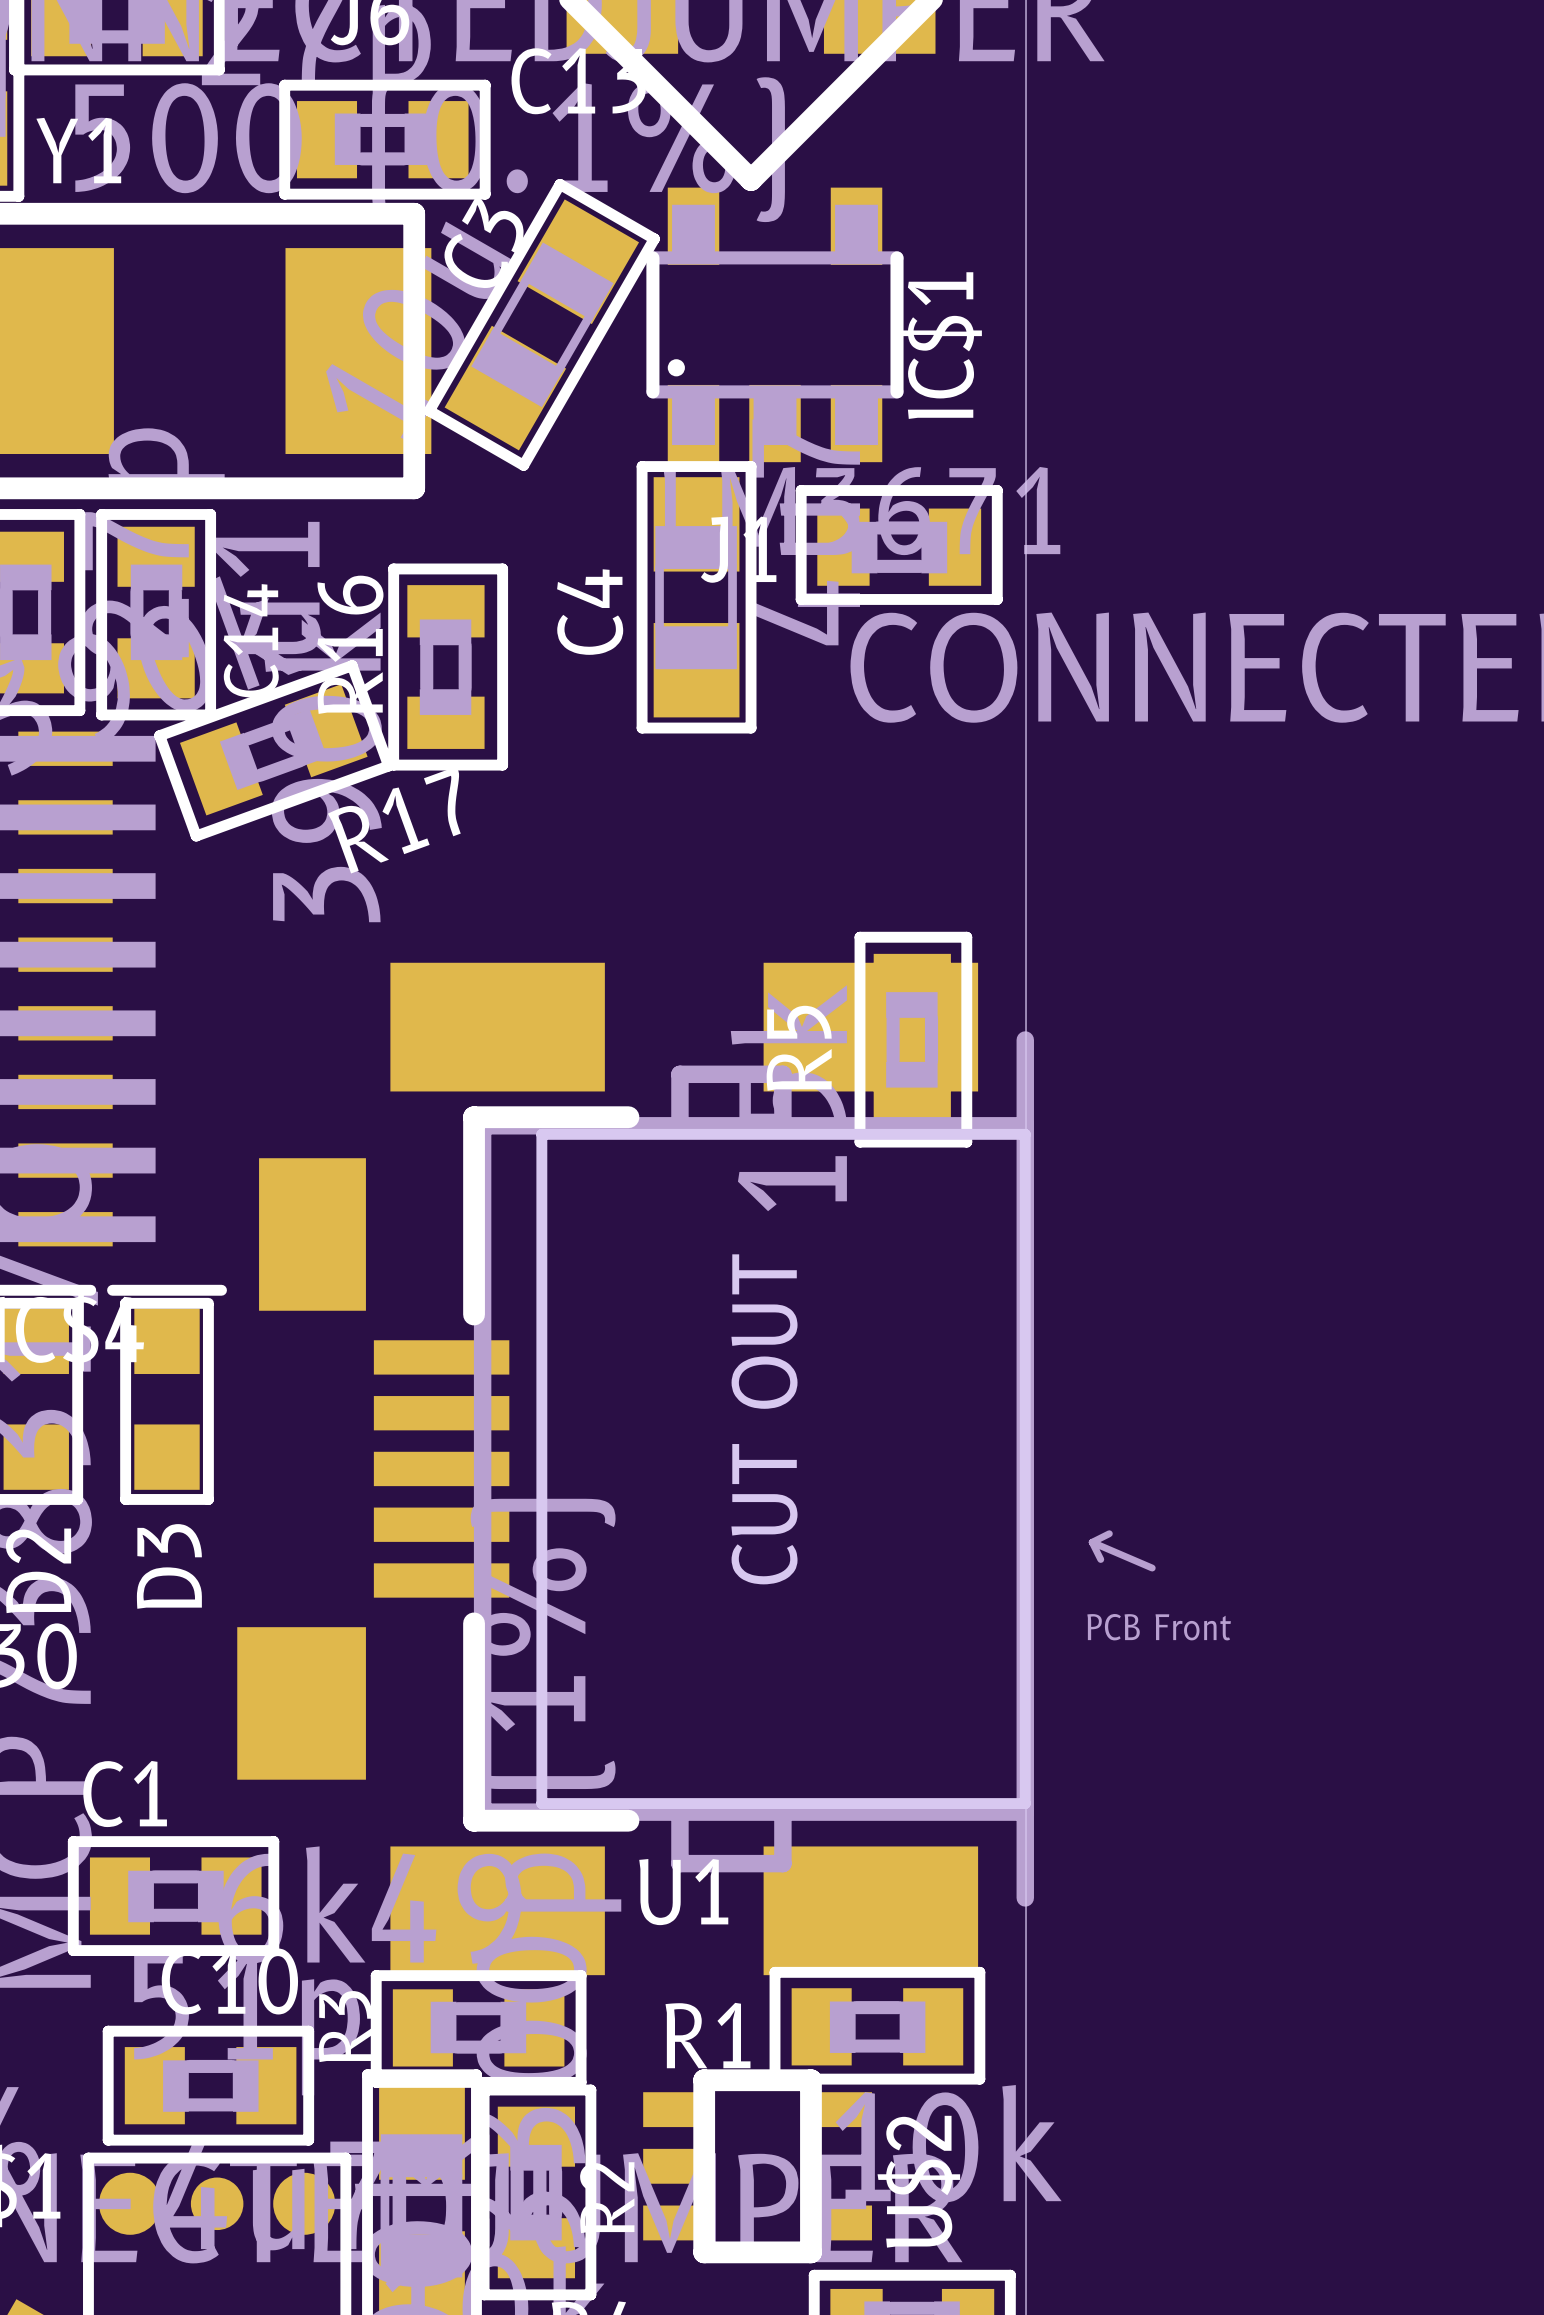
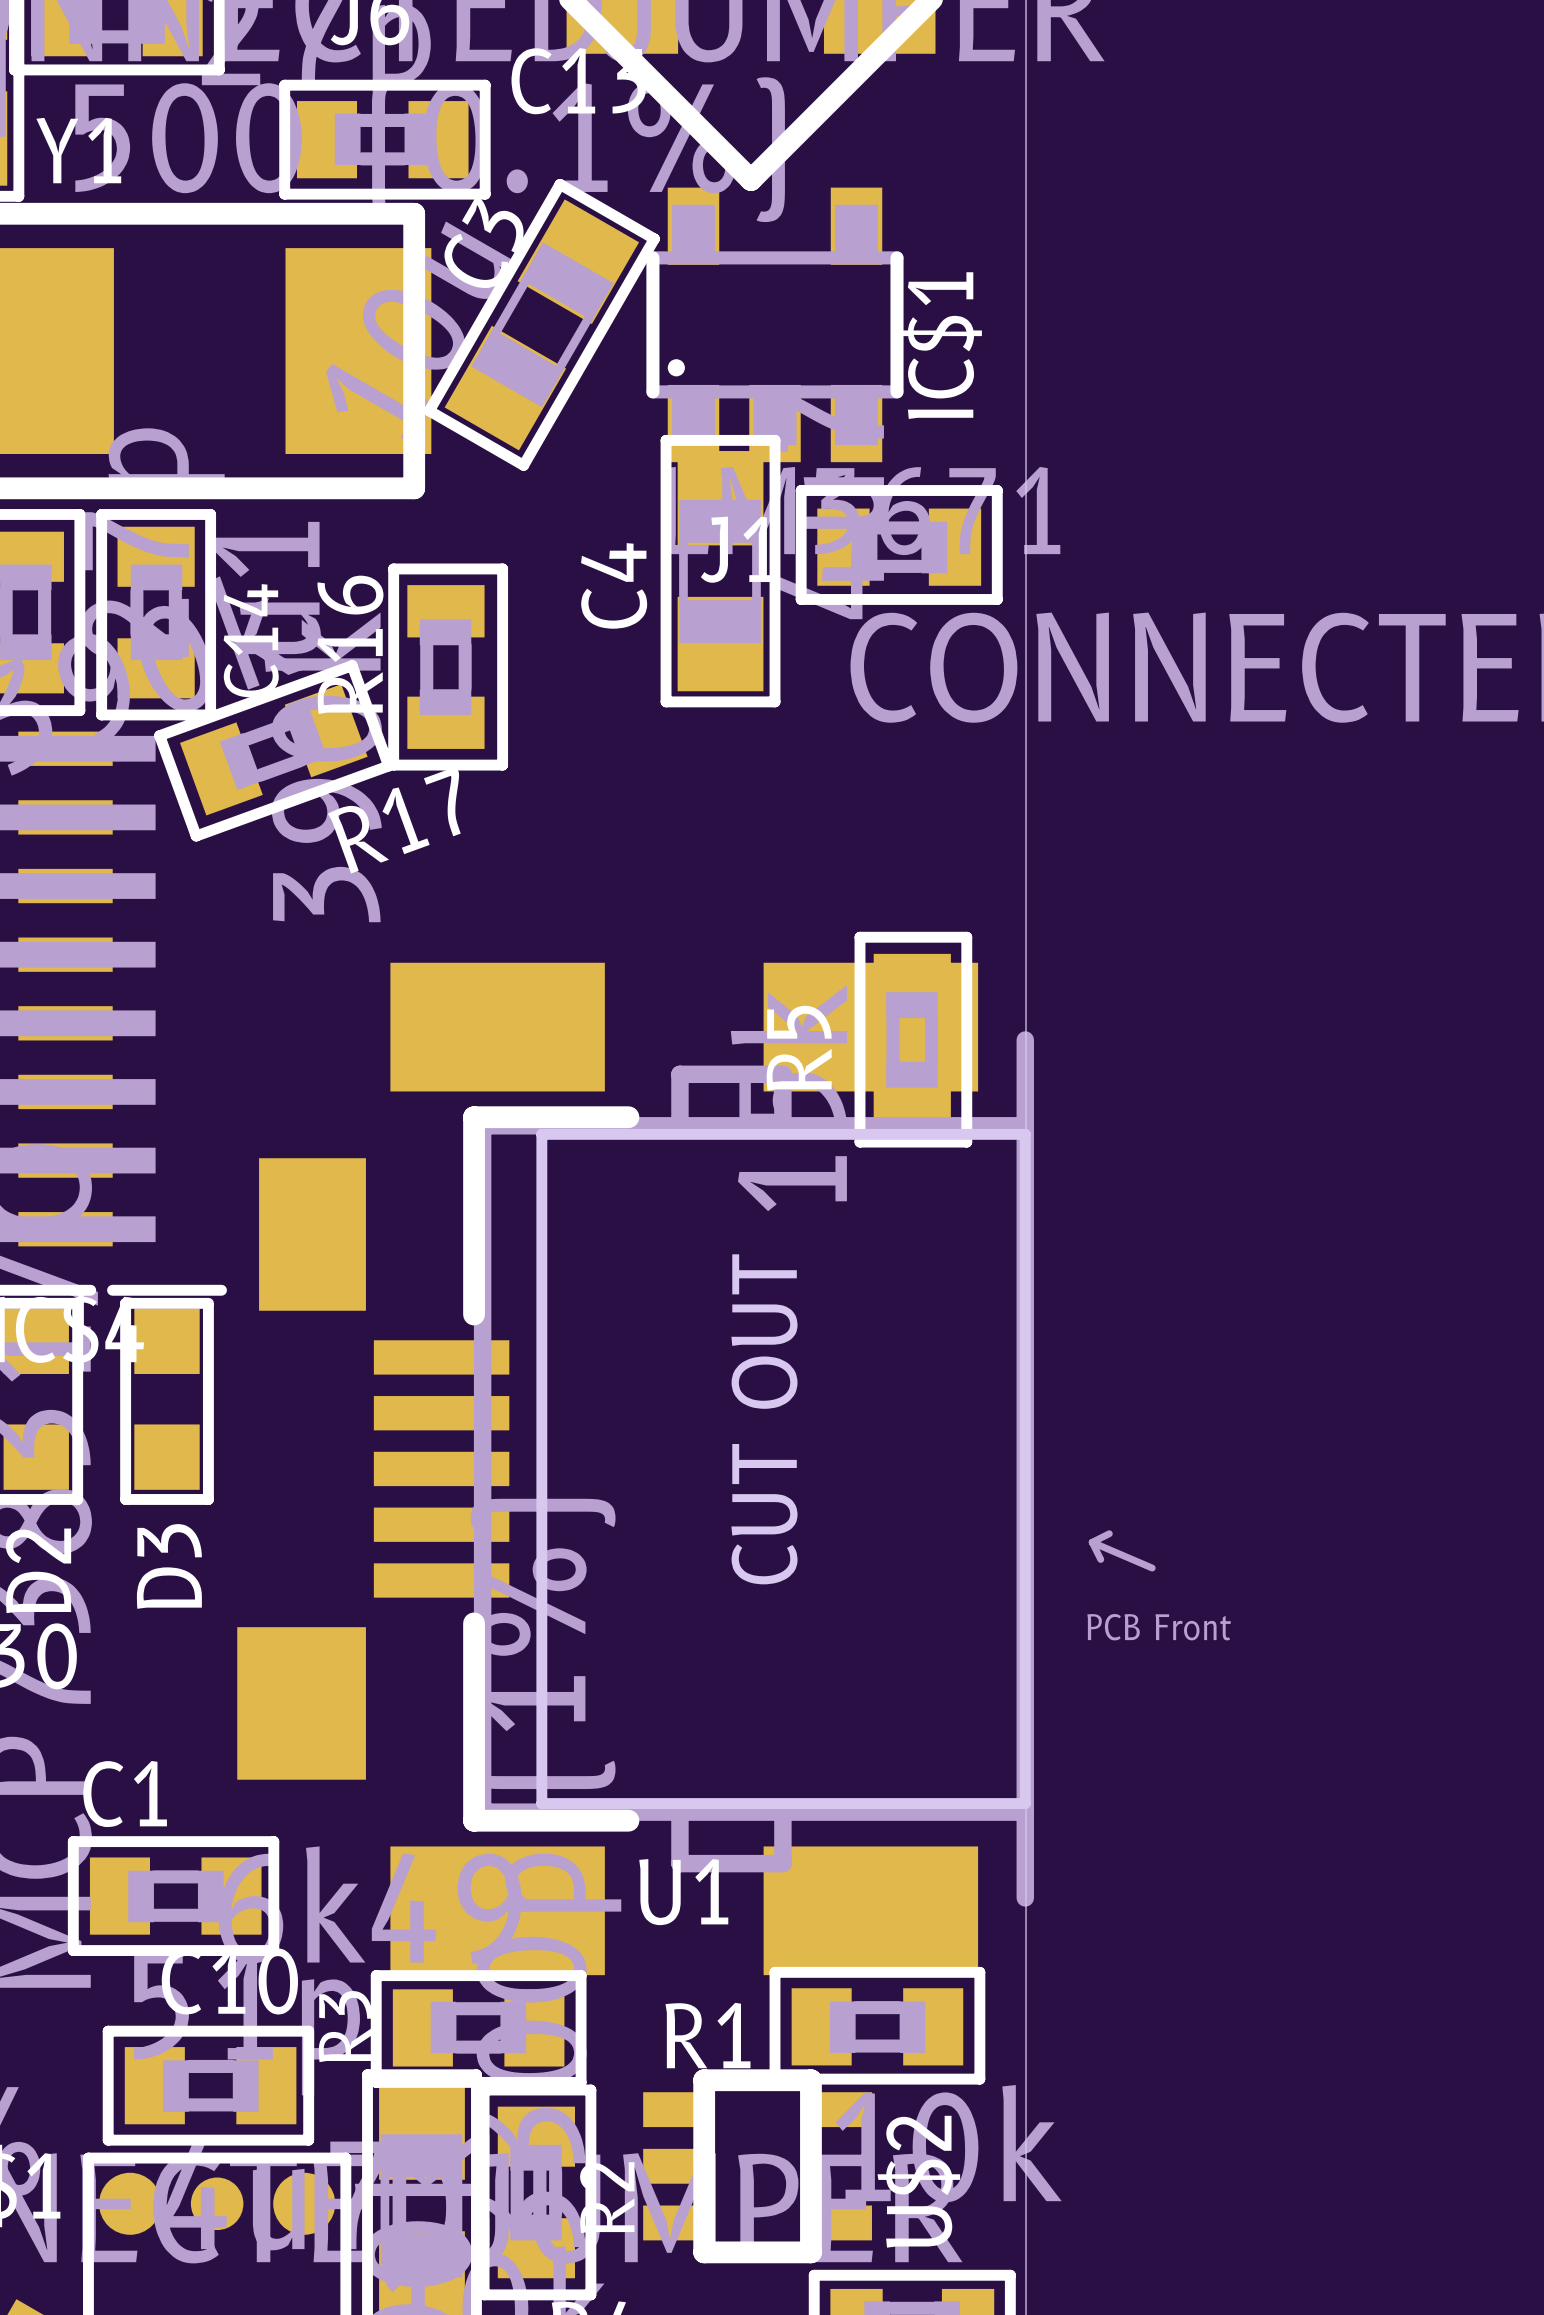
C4 position: (696, 597) -> (720, 571)

